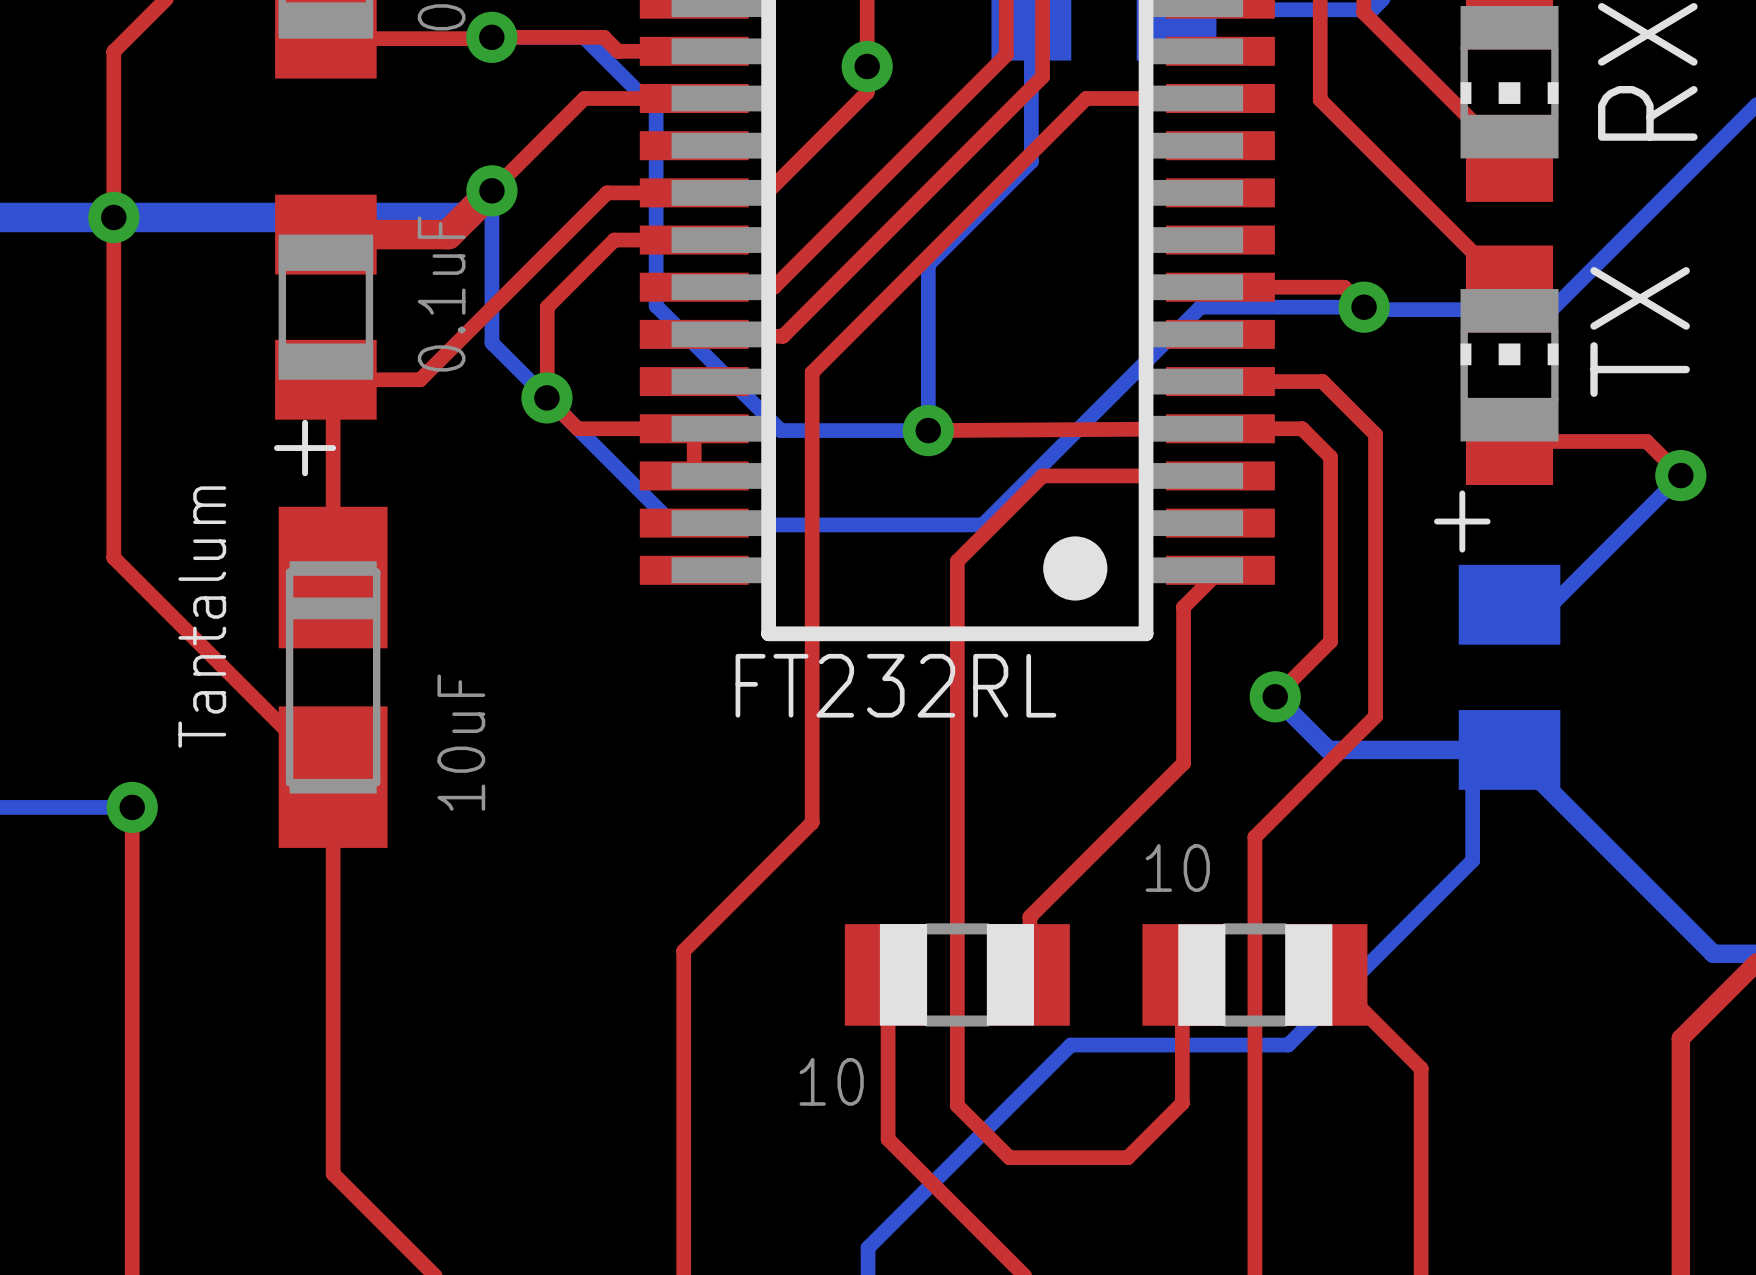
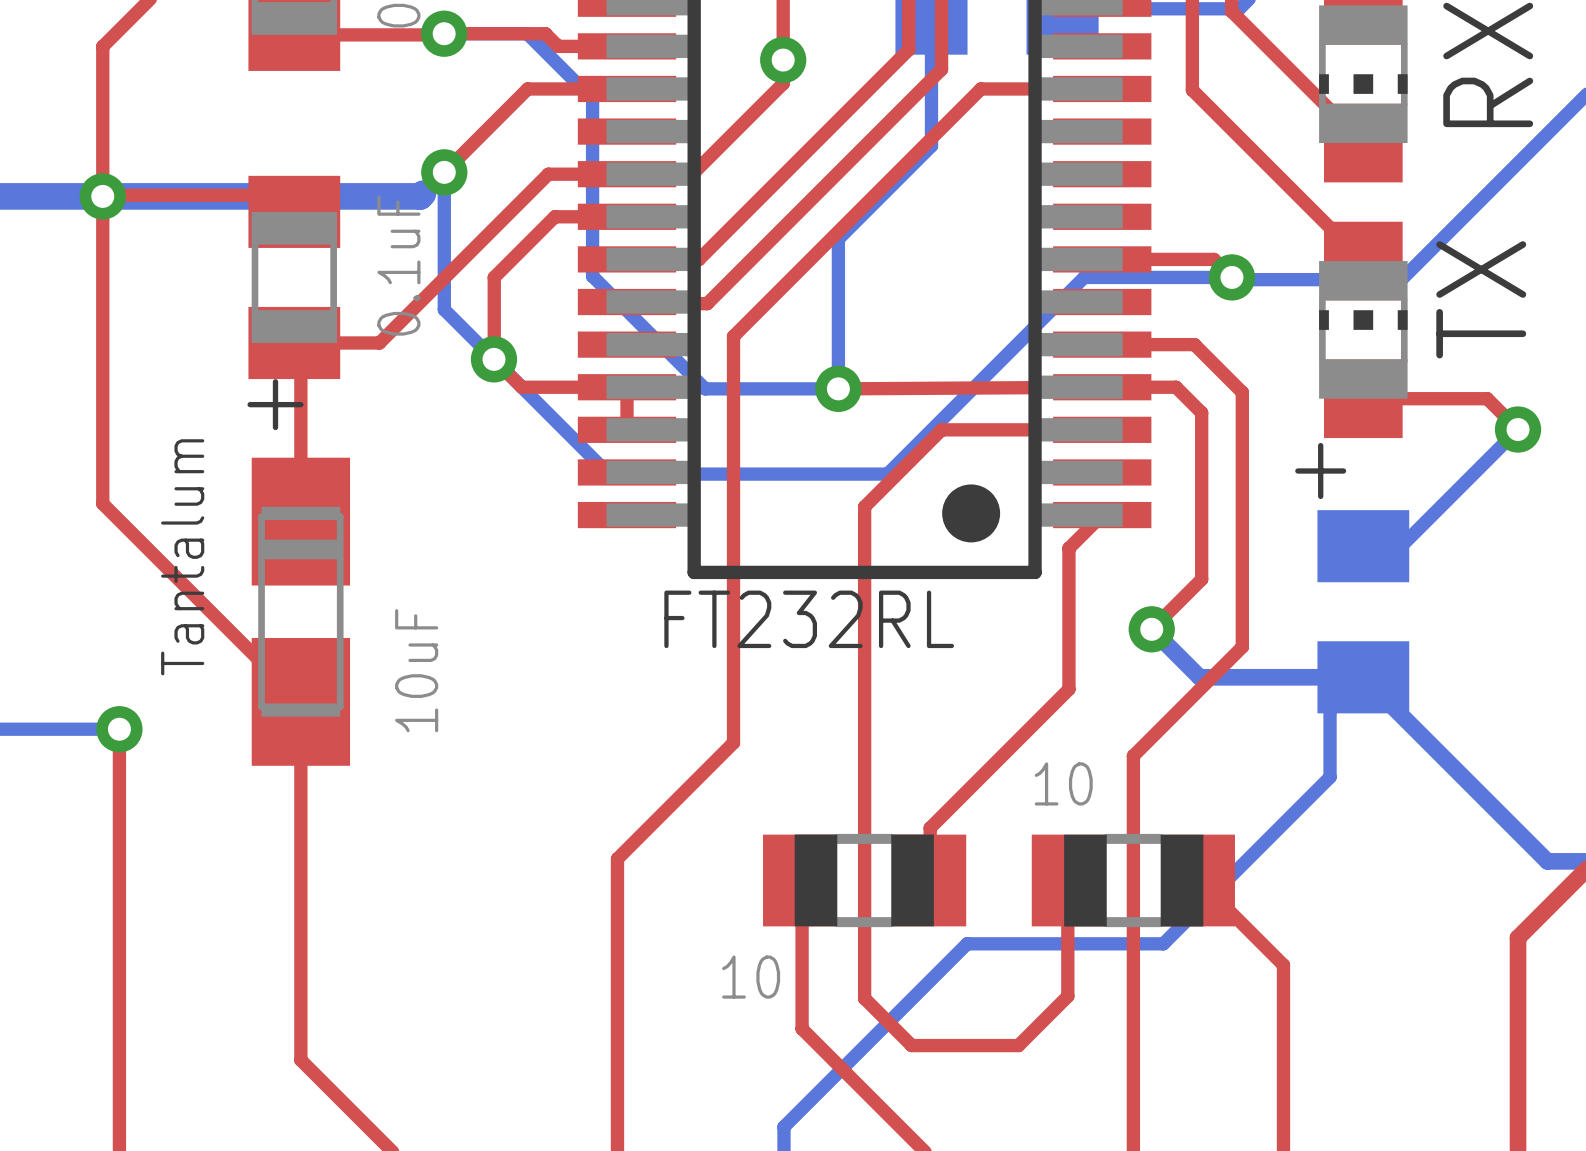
top track: (491, 190) (448, 234) (325, 234) -> (102, 196) (277, 195) (294, 211)

